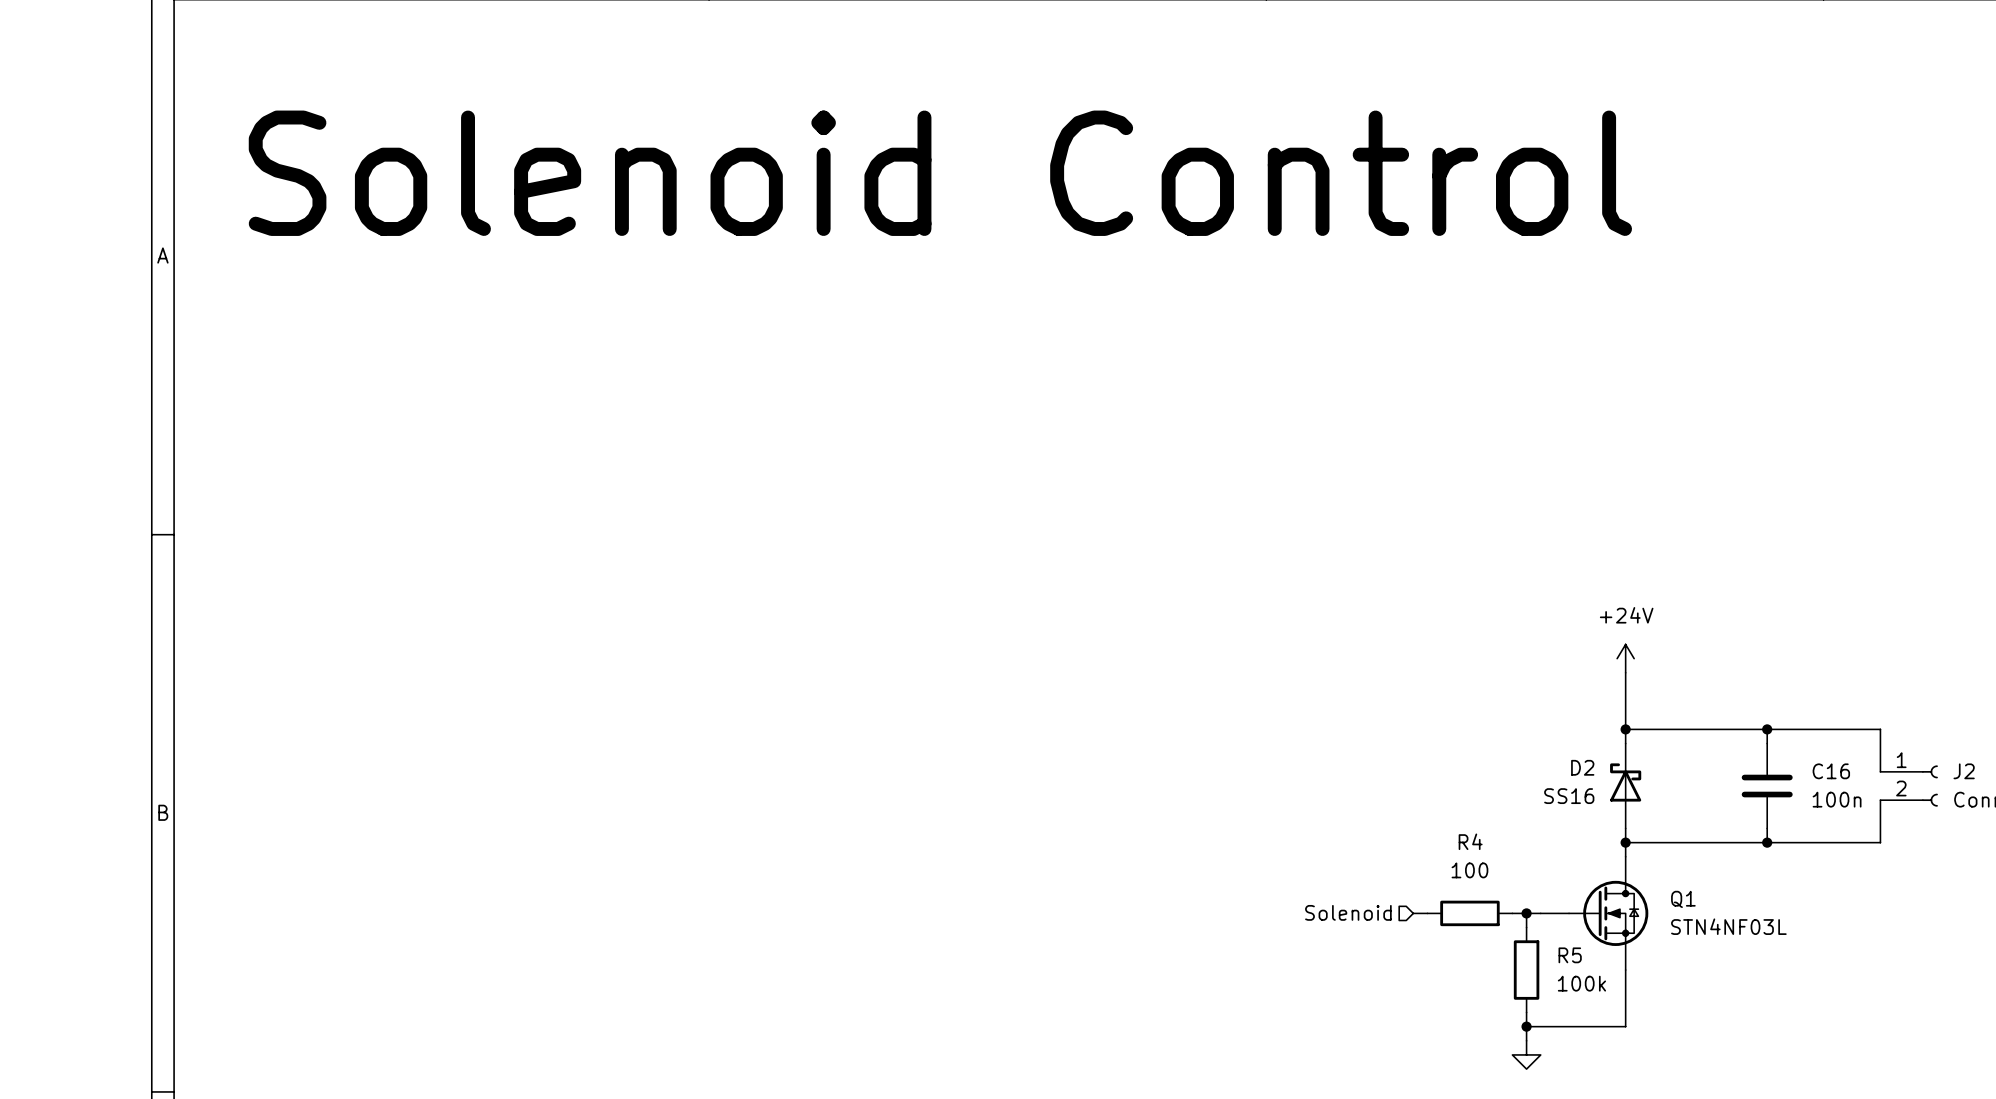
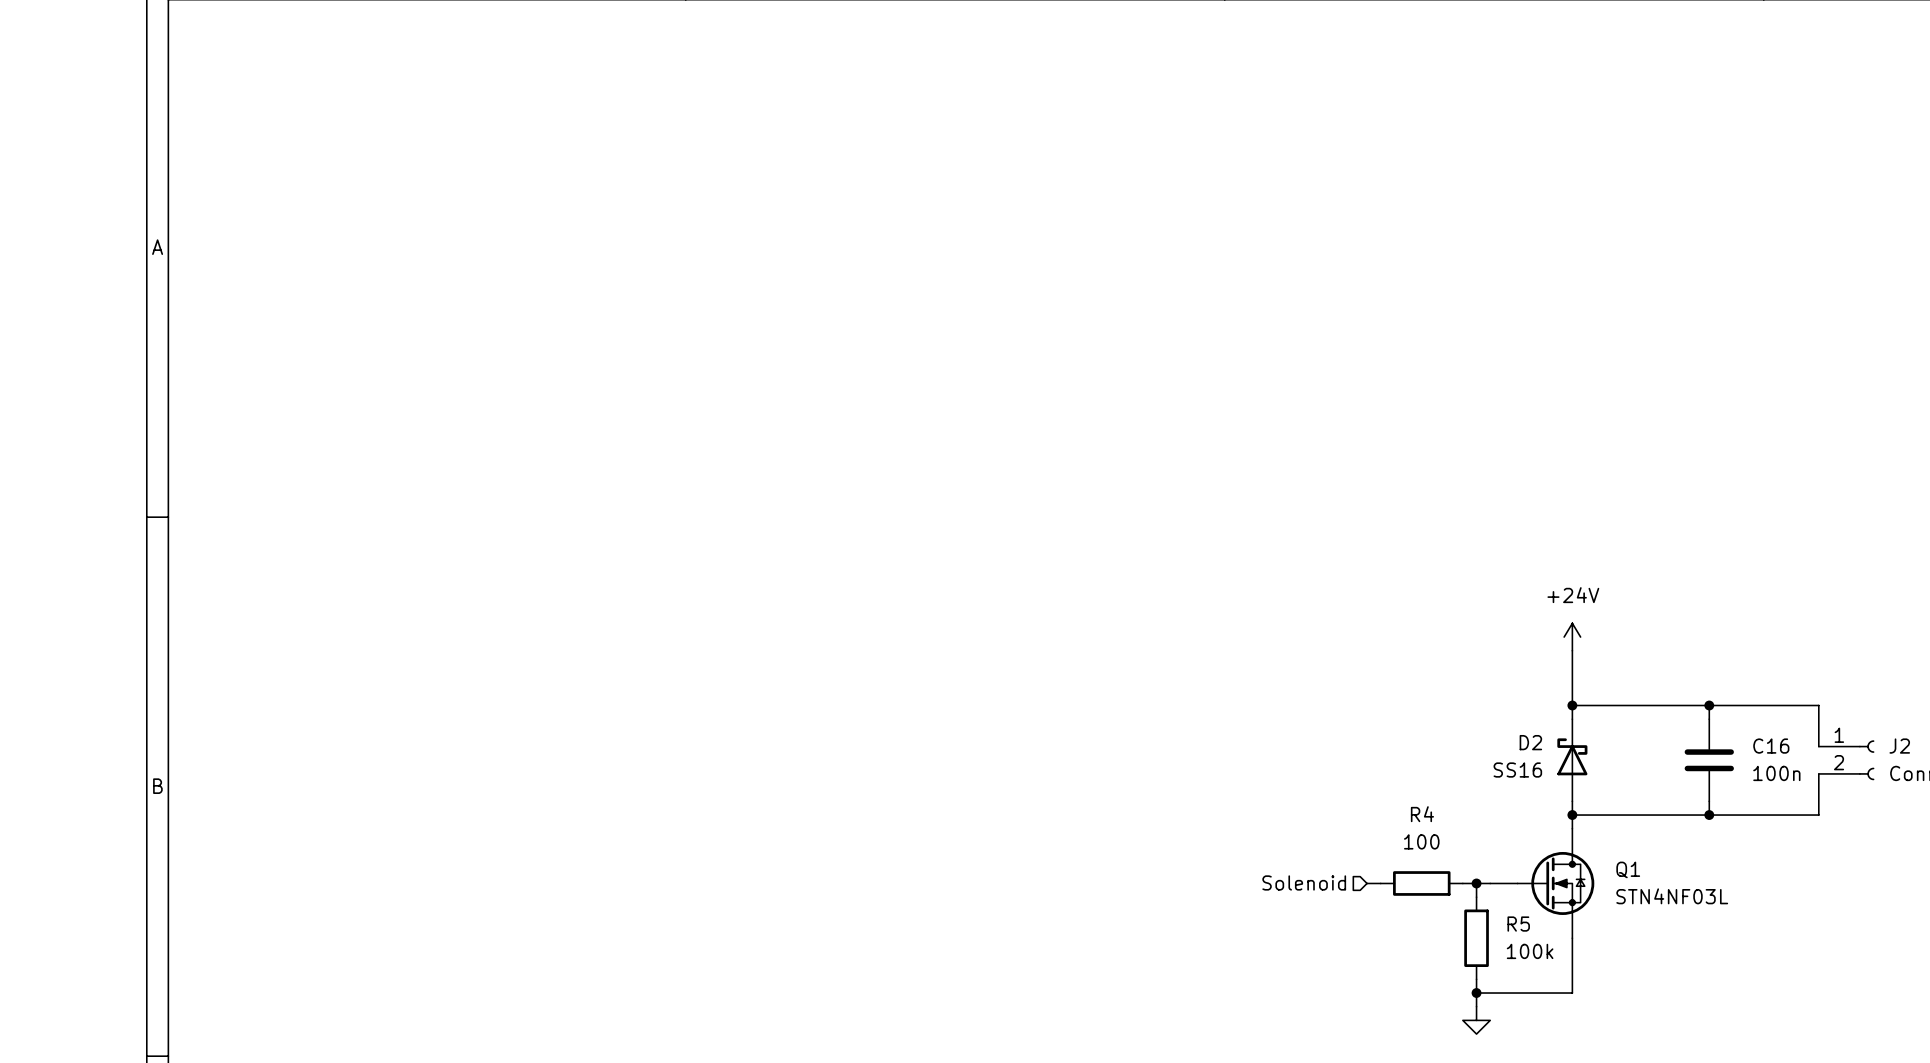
text: Solenoid Control (940, 173) -> none

